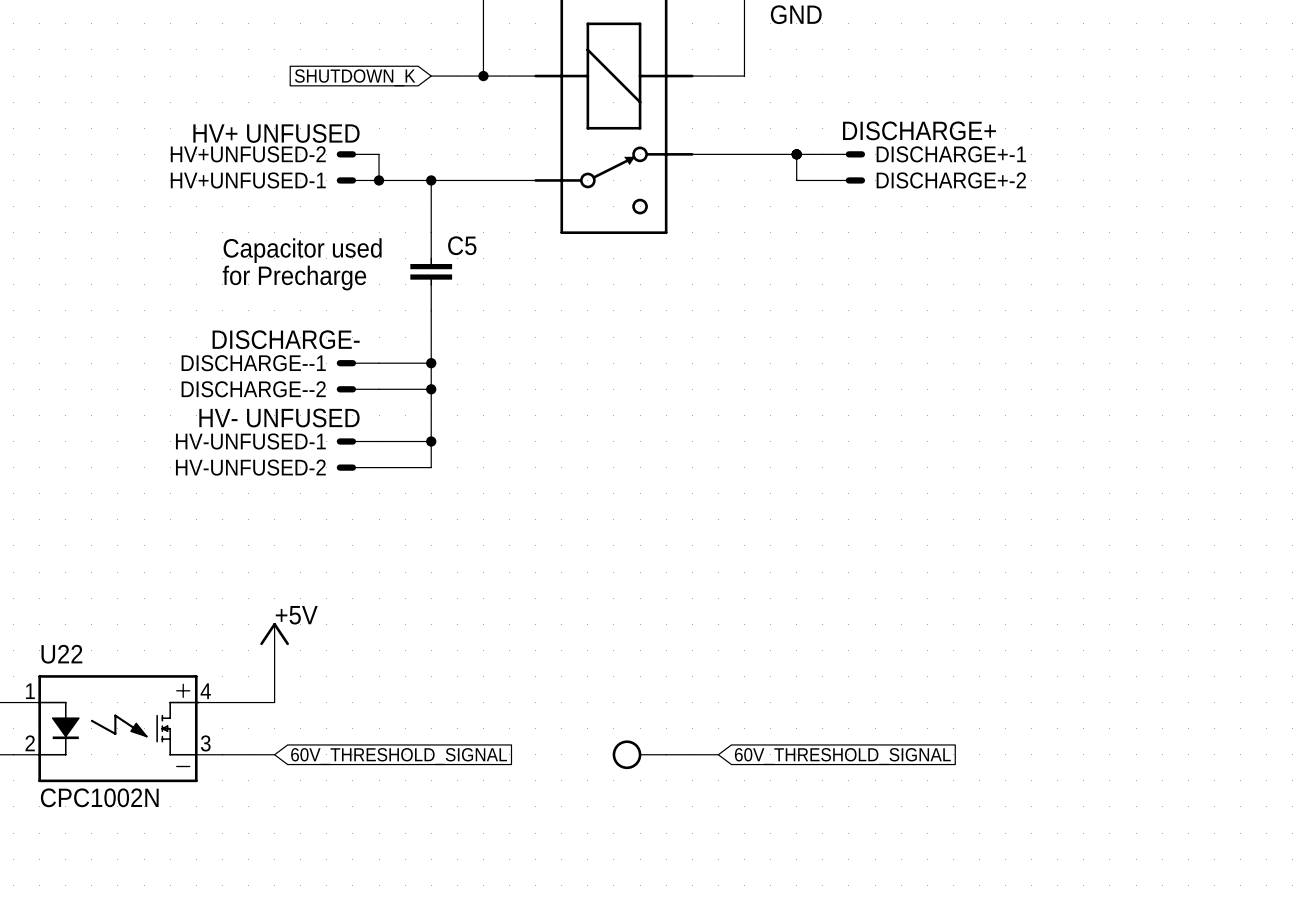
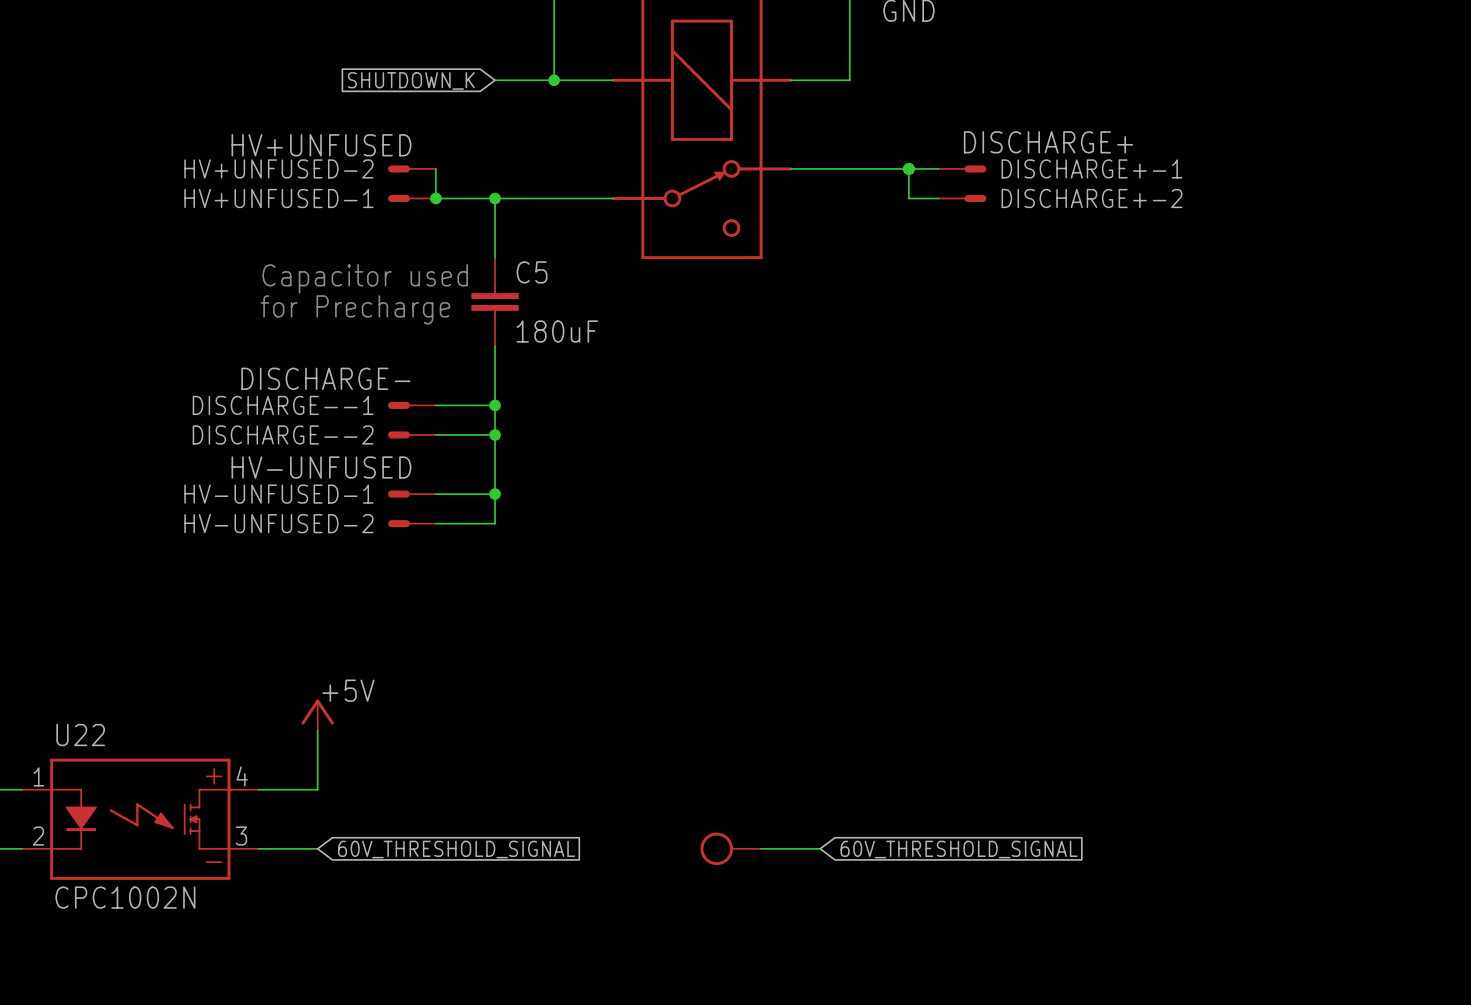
HV+UNFUSED-1 value: HV+ UNFUSED (276, 133) -> HV+UNFUSED (321, 145)
C5 value: none -> 180uF (557, 331)
HV-UNFUSED-1 value: HV- UNFUSED (279, 418) -> HV-UNFUSED (321, 467)

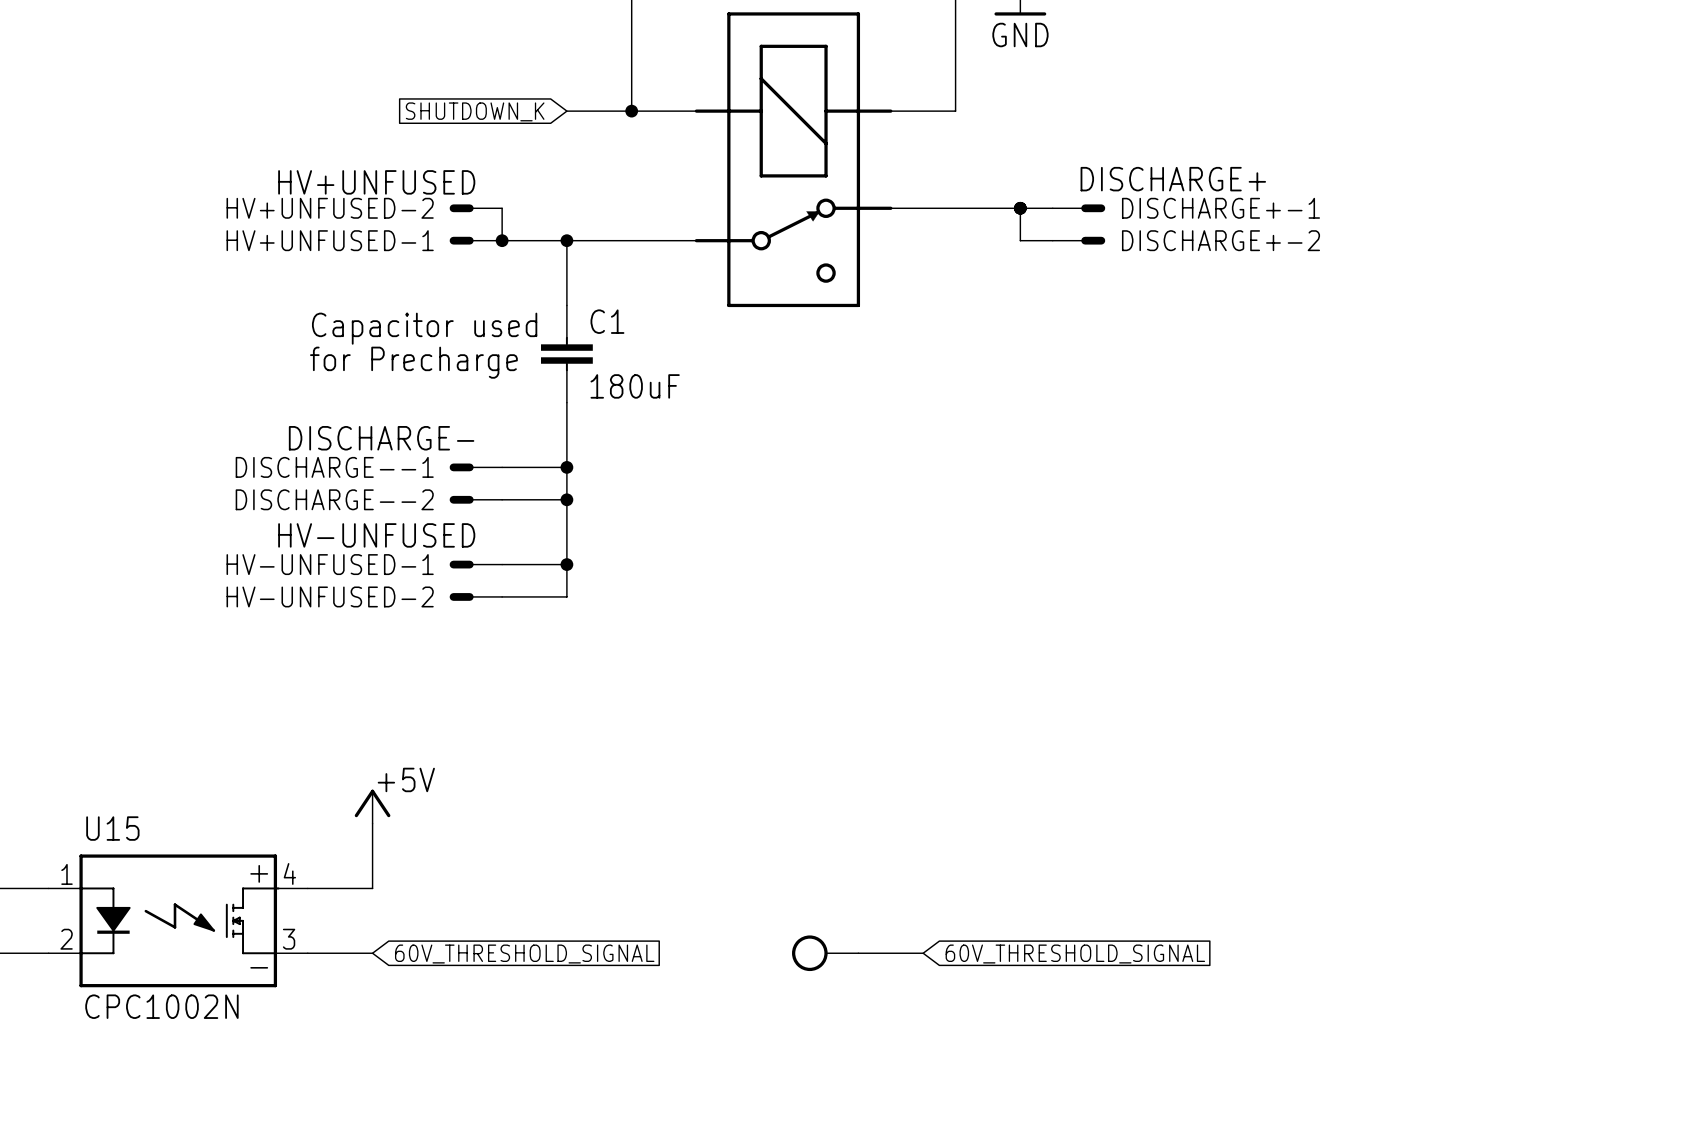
C5 name: C5 (532, 272) -> C1 (607, 321)
U22 name: U22 (80, 735) -> U15 (112, 828)

